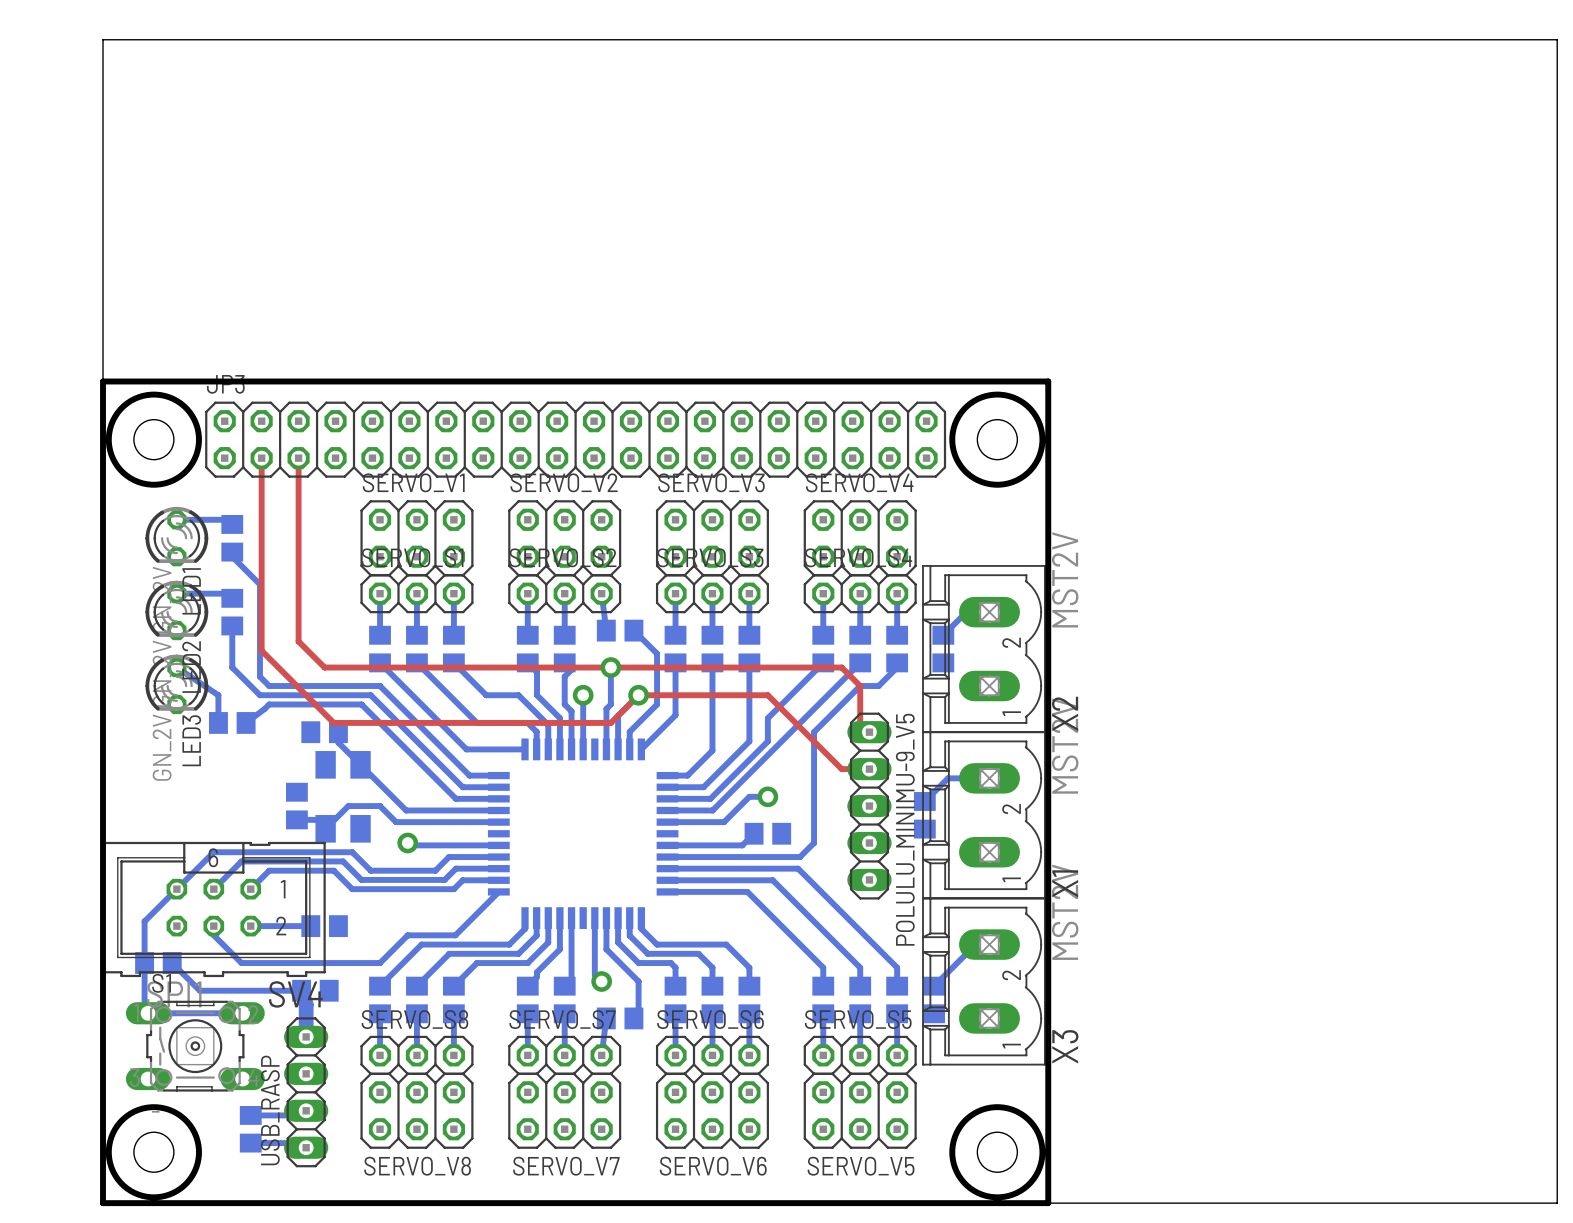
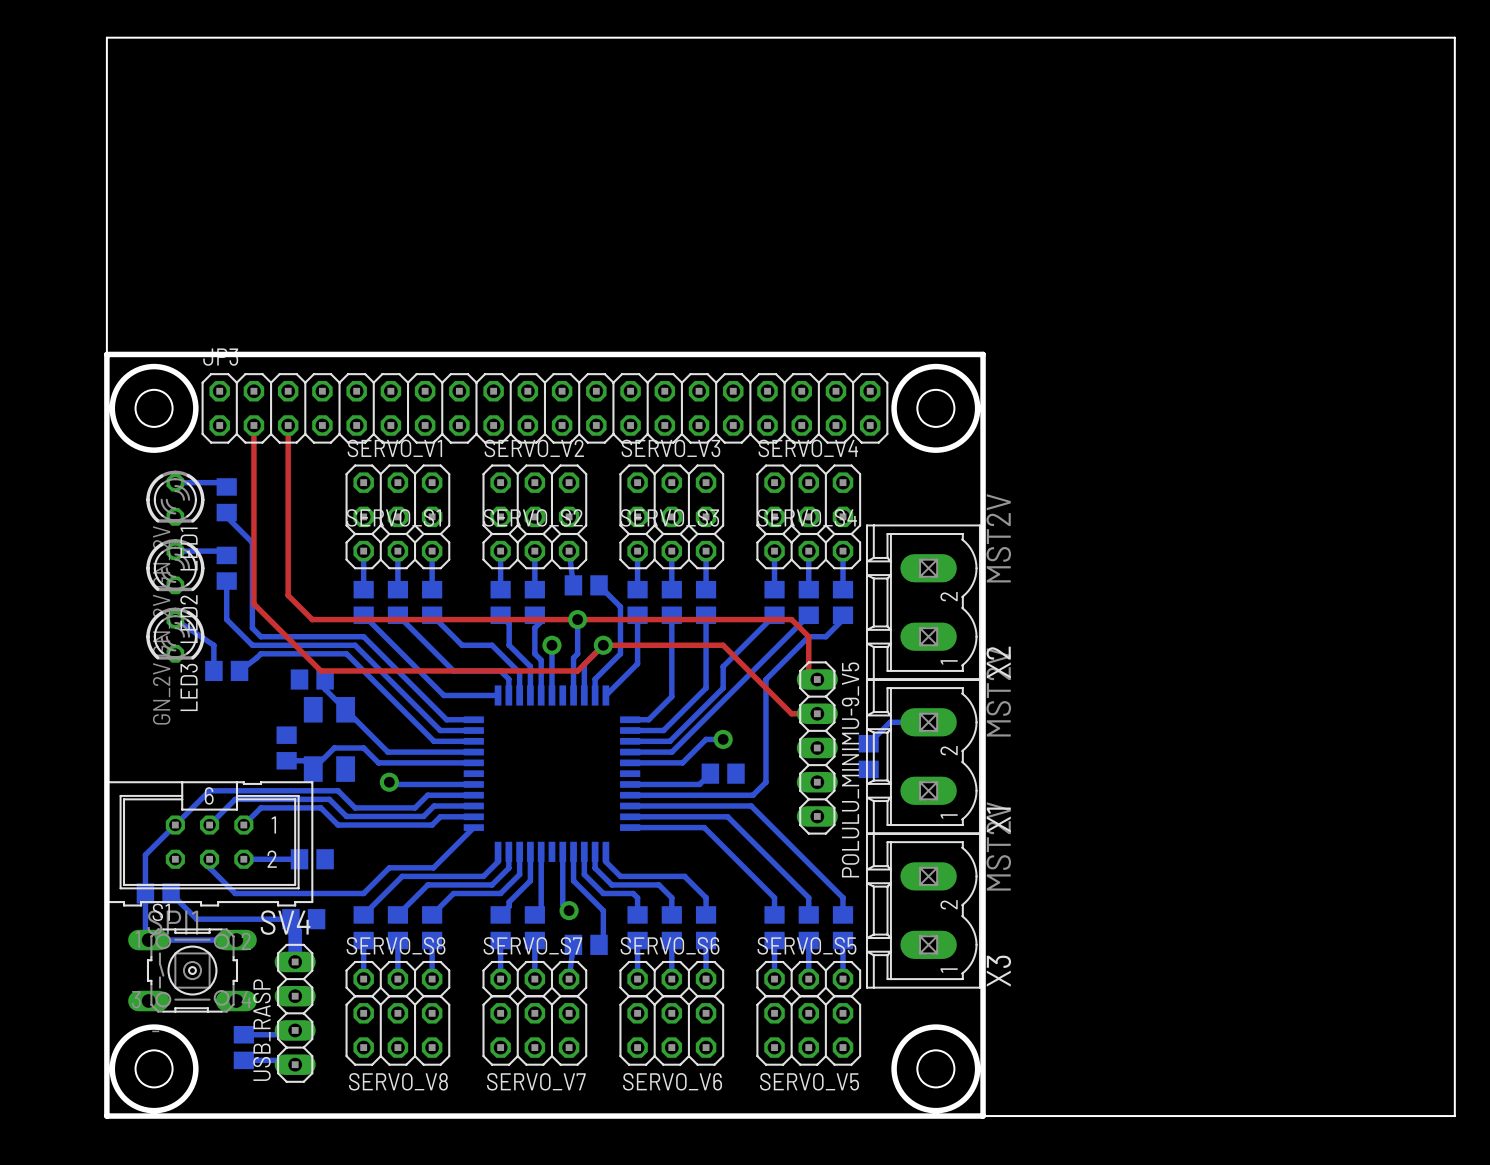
bottom track: (966, 612) (943, 635) -> none
part: (943, 649) -> none
bottom track: (975, 944) (934, 986) -> none
part: (934, 999) -> none

